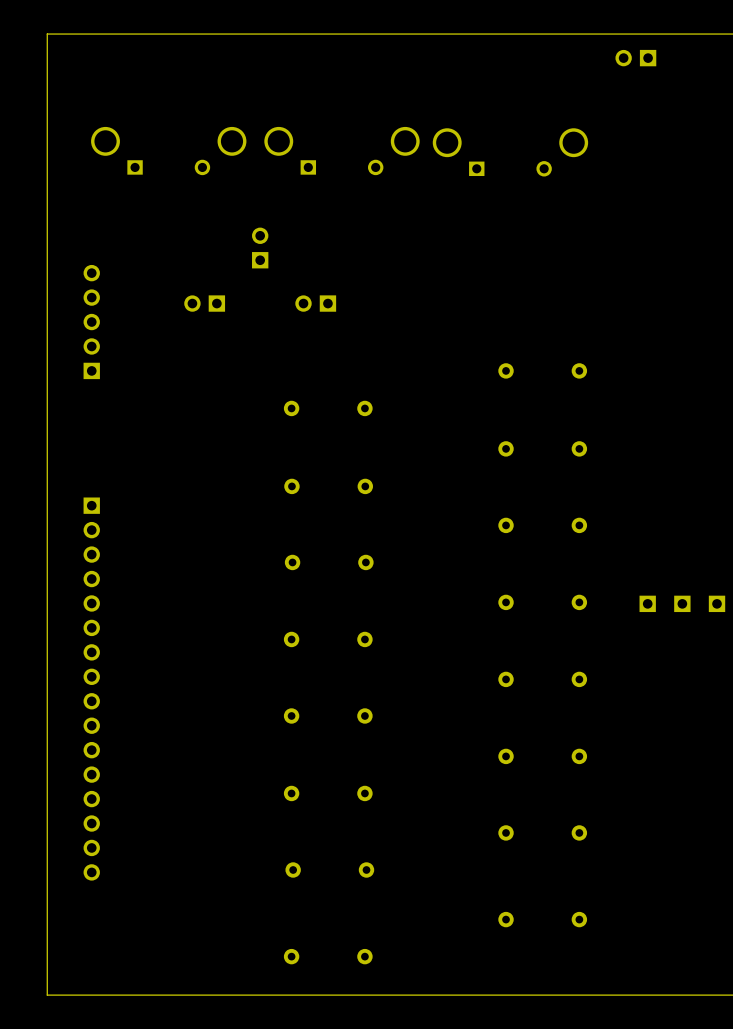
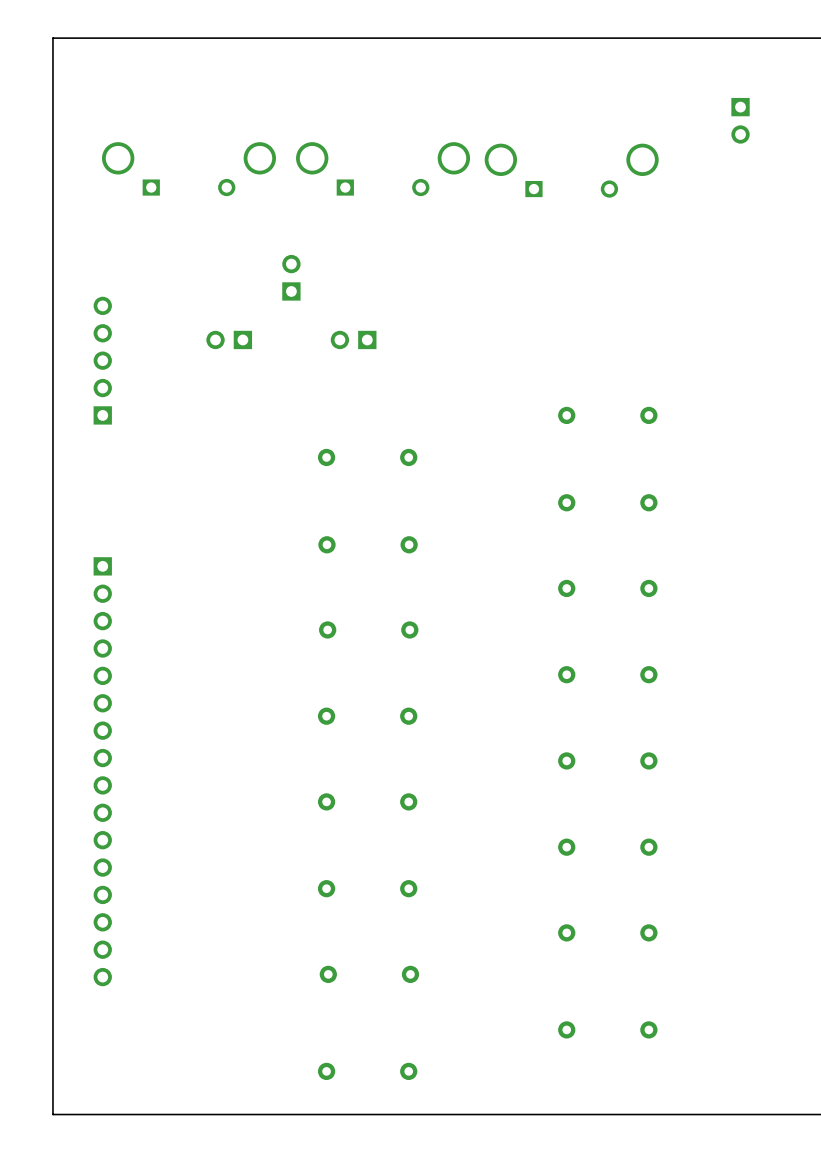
part rotation: 0° (635, 58) -> 90° counterclockwise (740, 120)
part position: (635, 58) -> (740, 120)
part: (647, 603) -> none
part: (682, 603) -> none
part: (717, 603) -> none

